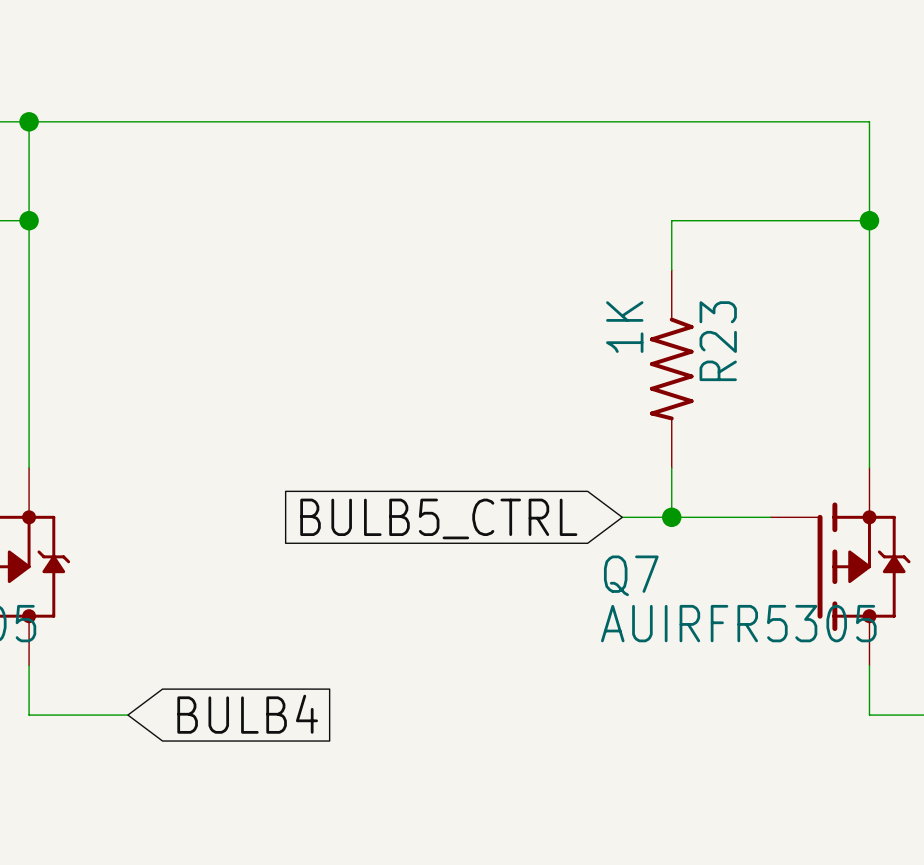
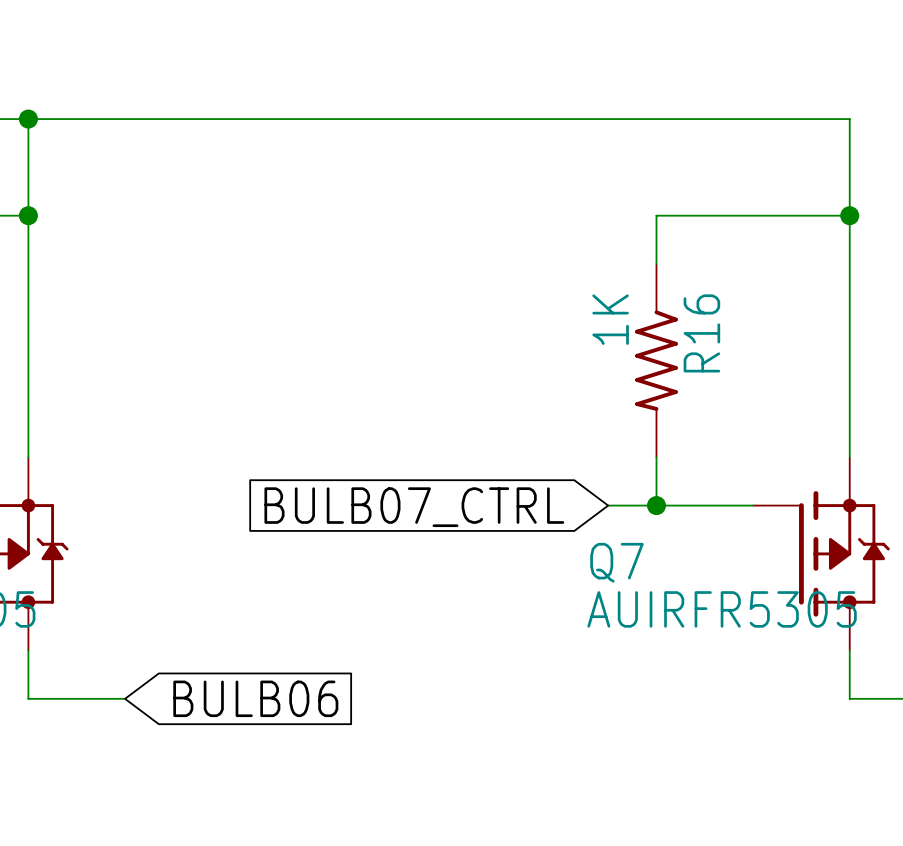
R23 name: R23 (718, 341) -> R16 (701, 333)
global label: BULB5_CTRL (438, 518) -> BULB07_CTRL (414, 507)
global label: BULB4 (247, 714) -> BULB06 (255, 698)

